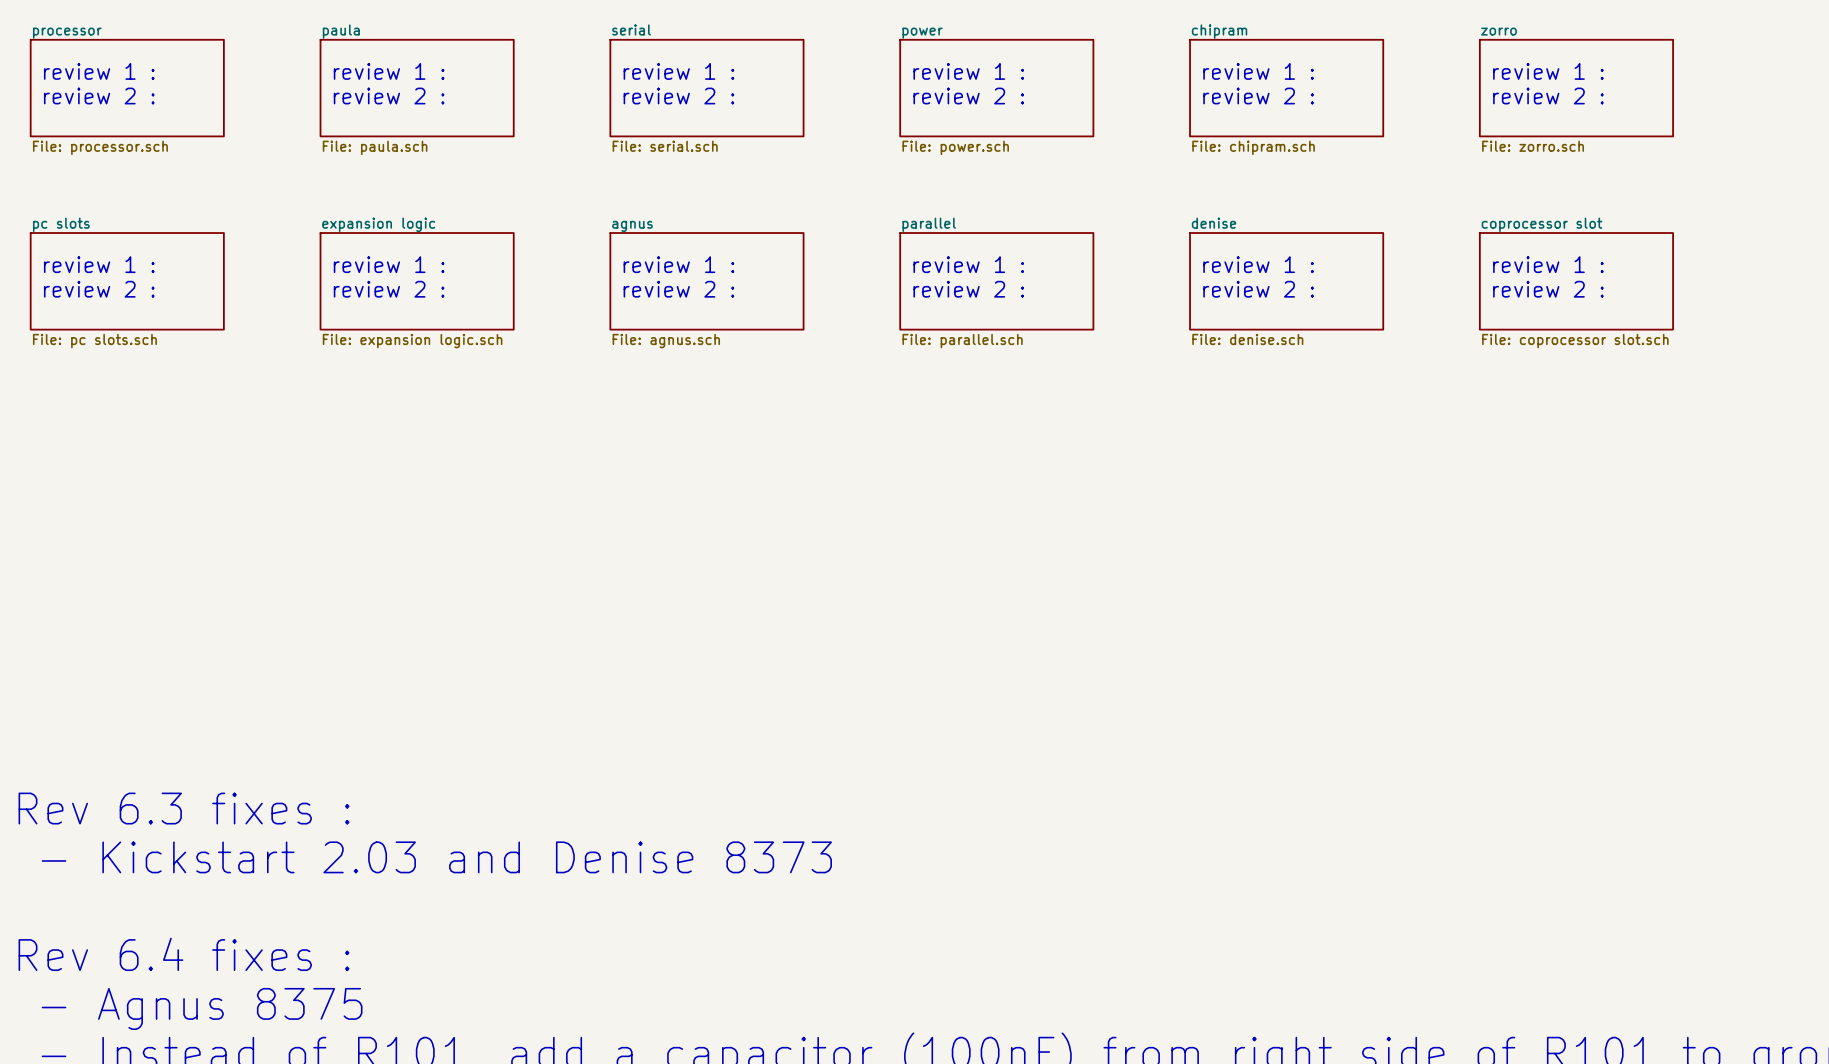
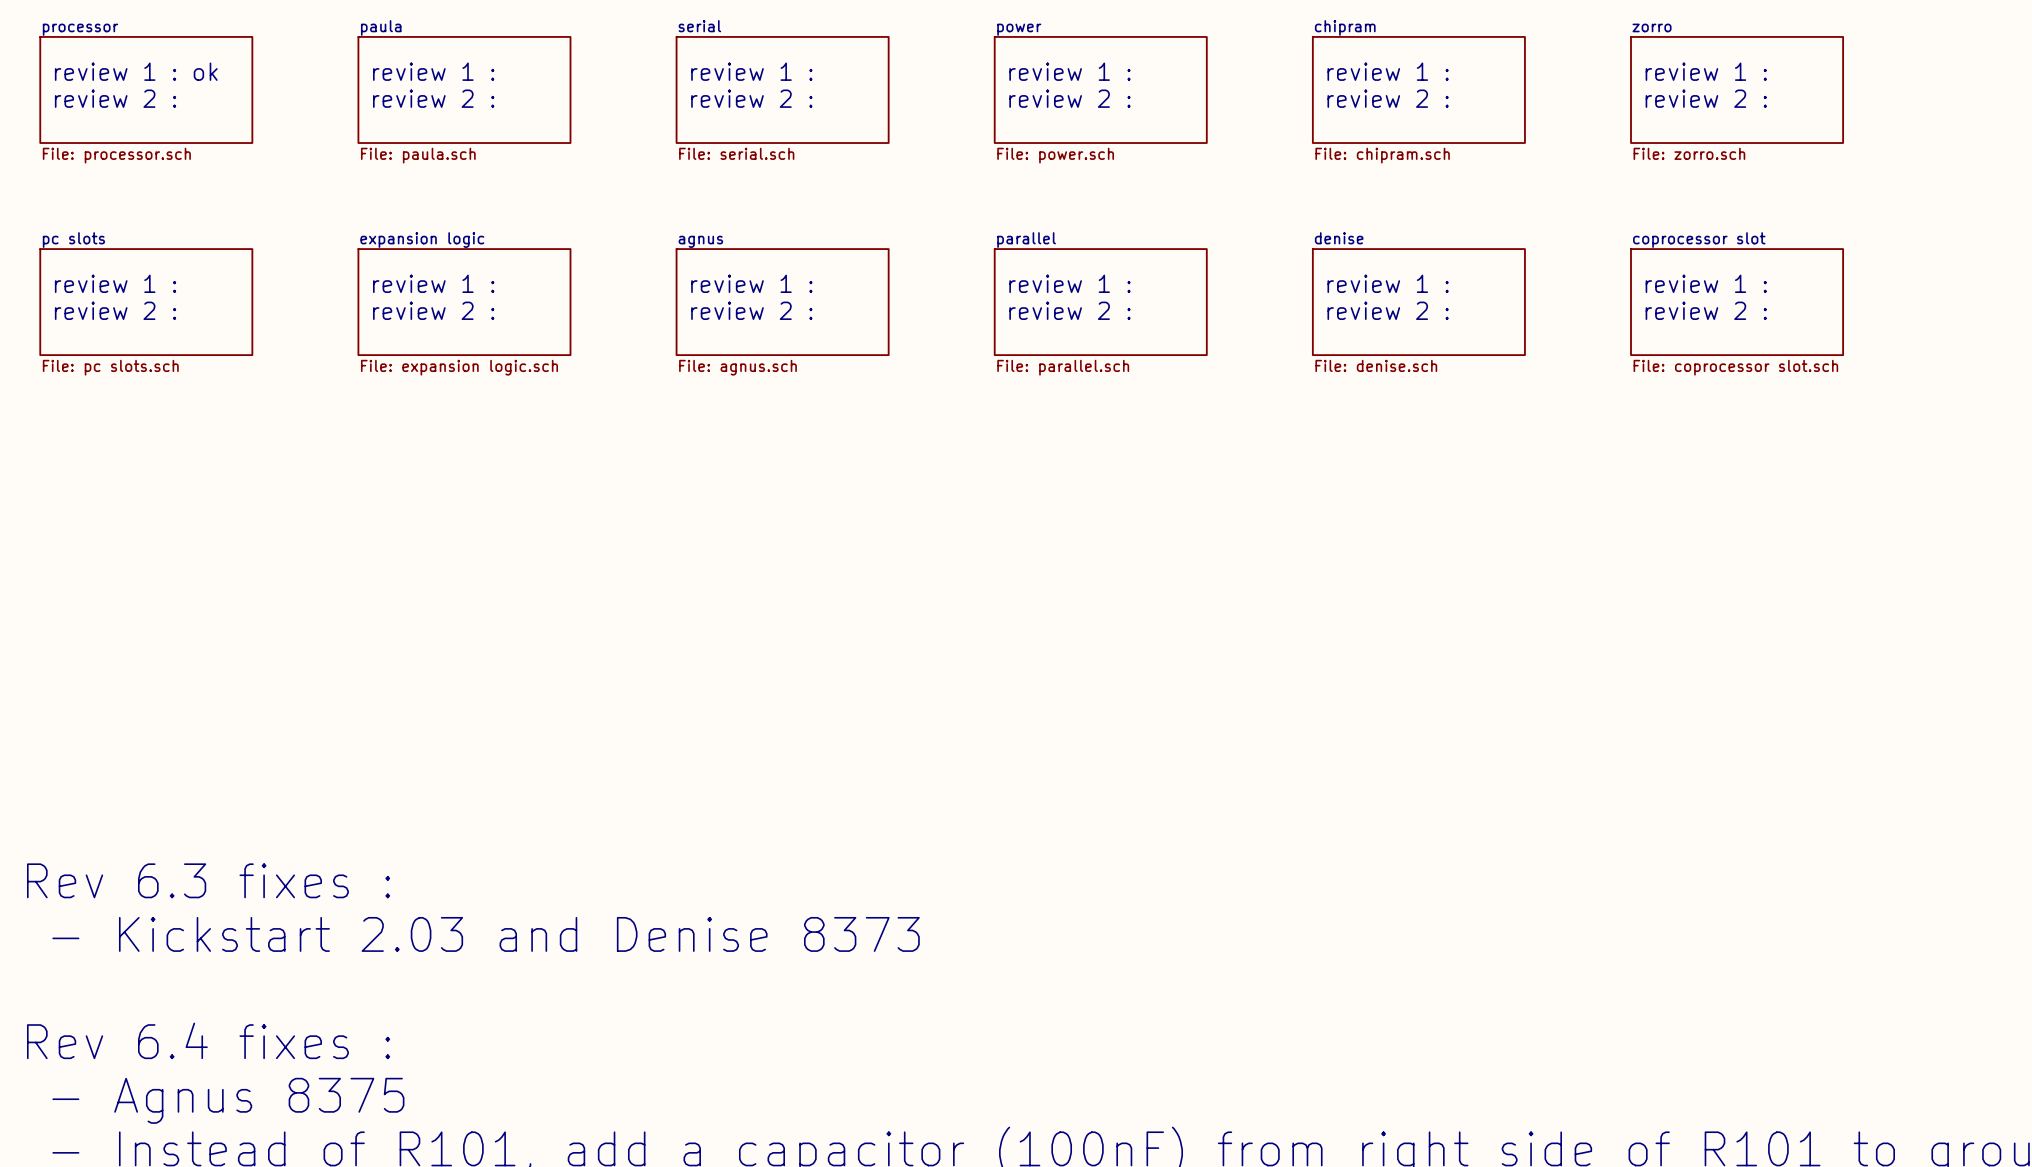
text: review 1 : (99, 71) -> review 1 : ok (136, 71)

